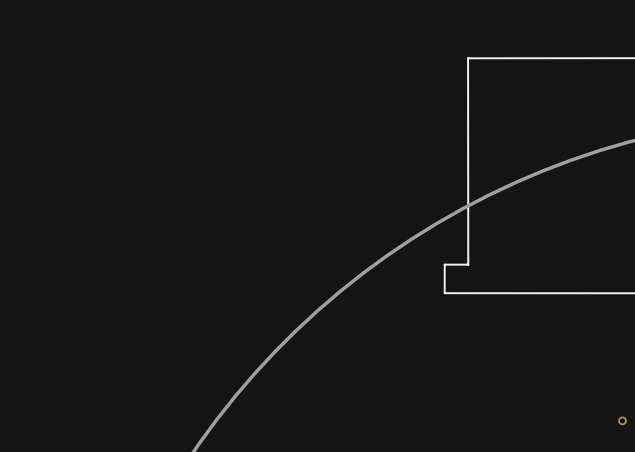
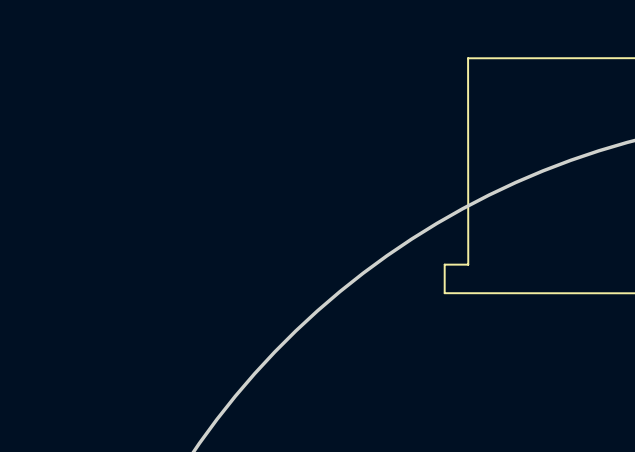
via: (622, 420) -> none

